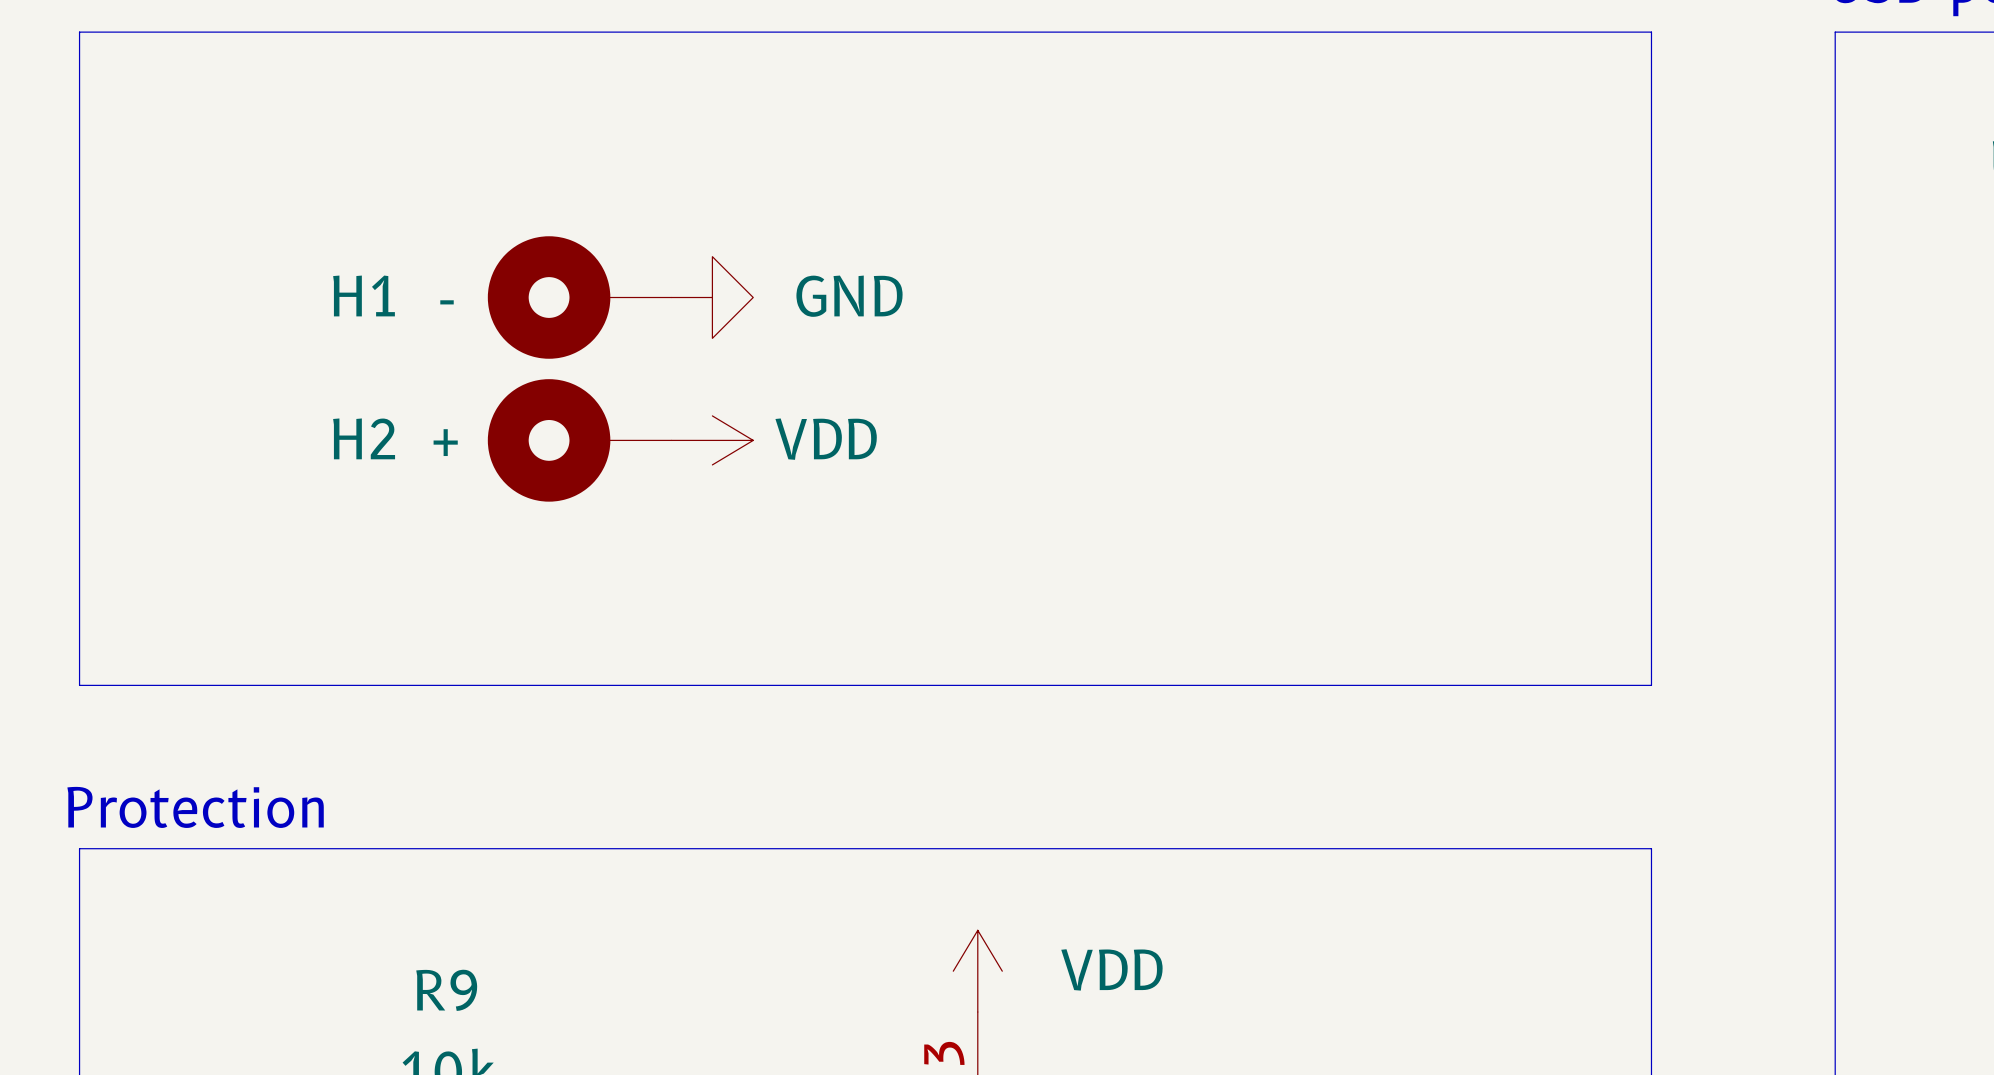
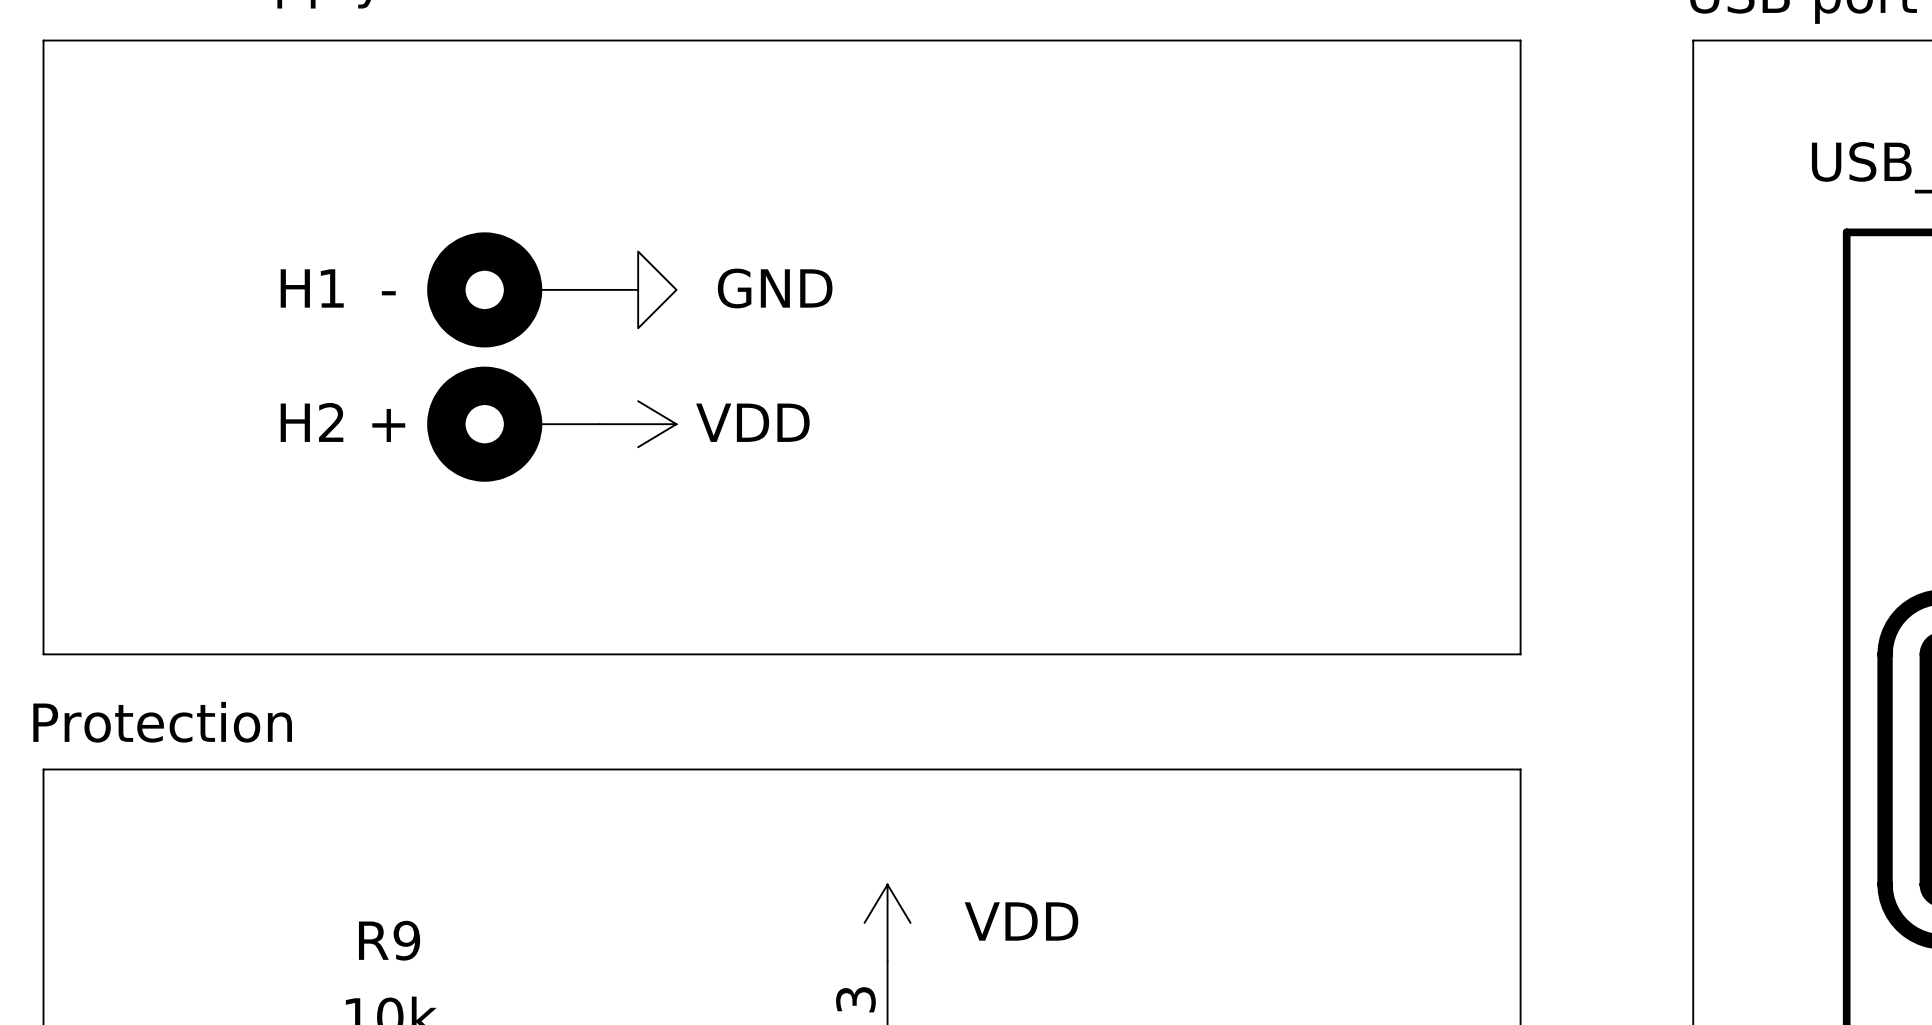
text position: Protection (195, 807) -> Protection (162, 722)
line: (79, 848) (1651, 848) -> (43, 807) (43, 769) (1520, 769) (1520, 807)

